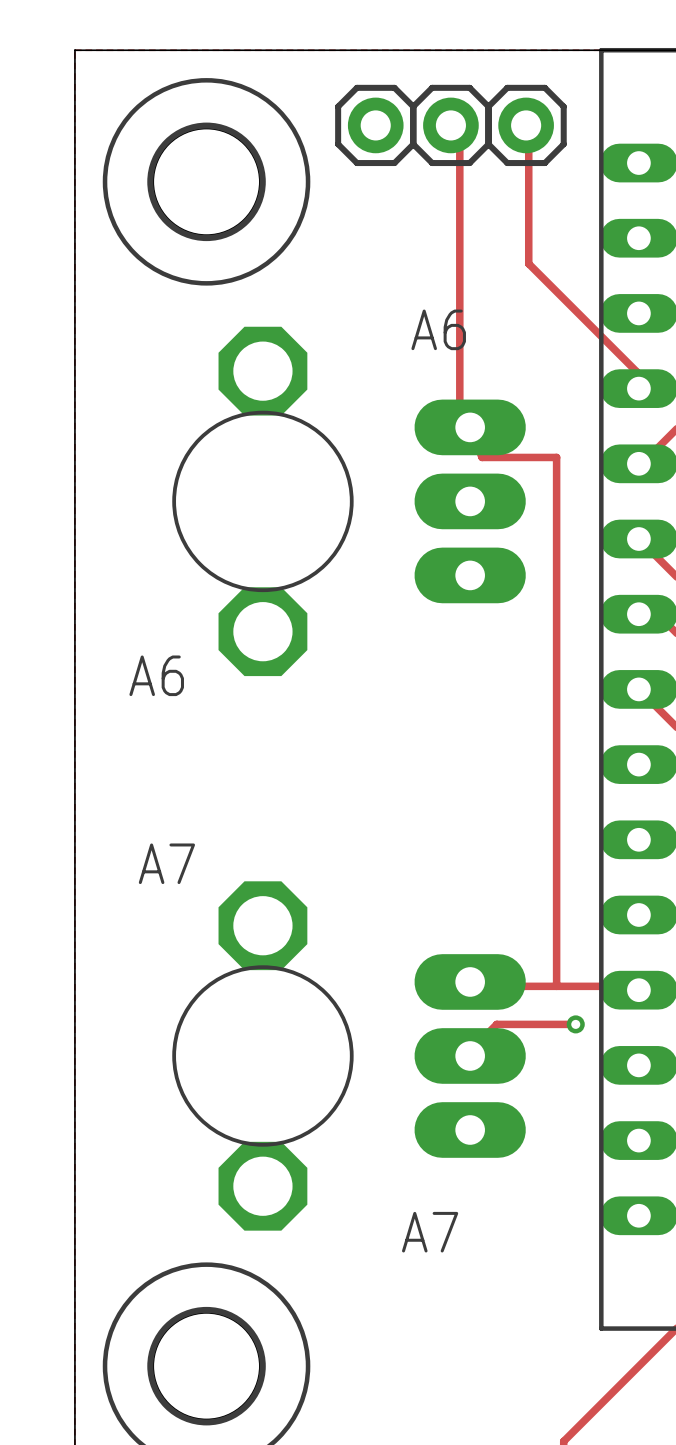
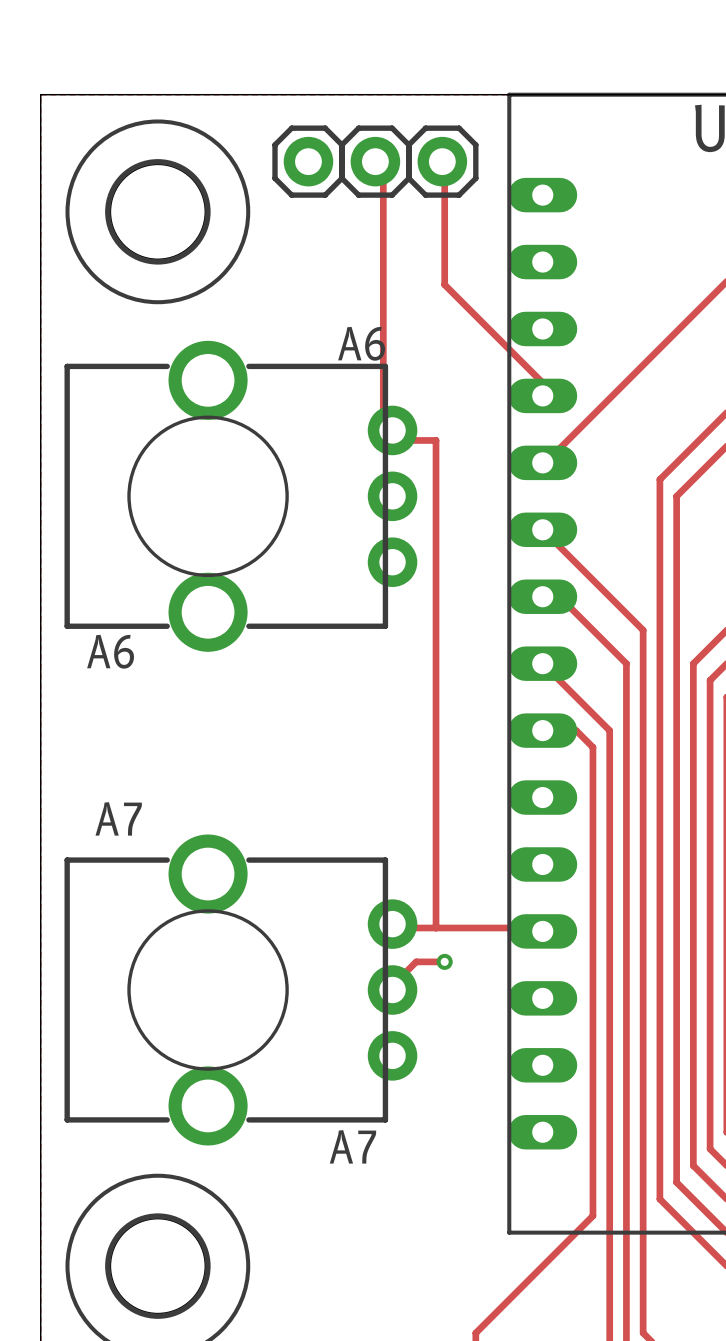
A6 footprint: [172, 326, 526, 677] -> [64, 340, 418, 652]
track: (474, 438) (482, 457) (556, 457) (556, 986) -> (396, 440) (436, 440) (436, 927)
A7 footprint: [172, 881, 526, 1231] -> [64, 834, 418, 1146]
track: (528, 1024) (575, 1024) -> none
via position: (575, 1024) -> (444, 961)

